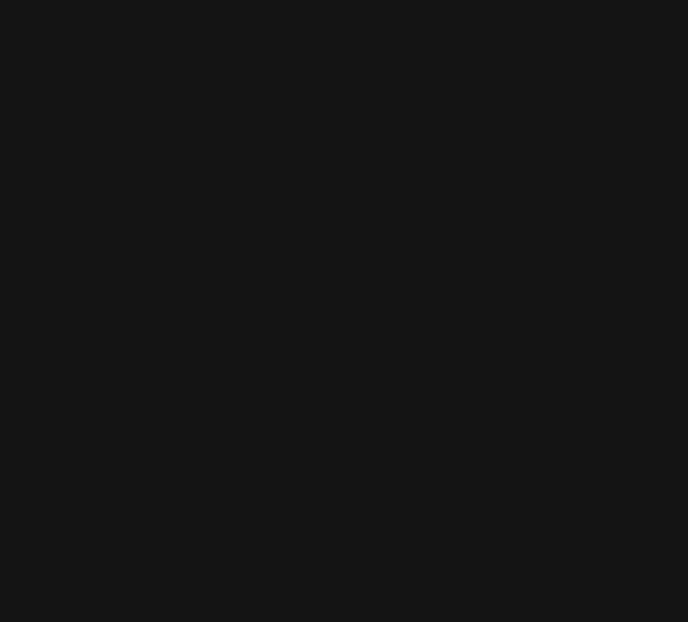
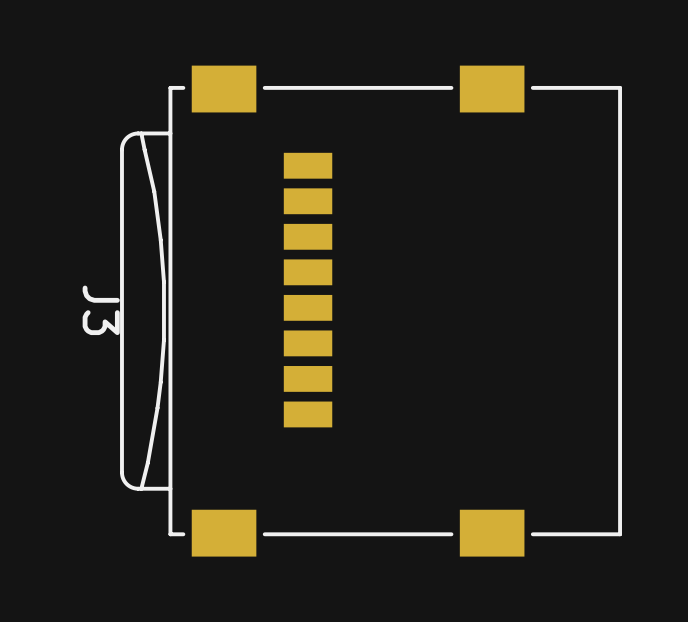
J3: none -> (371, 311)

